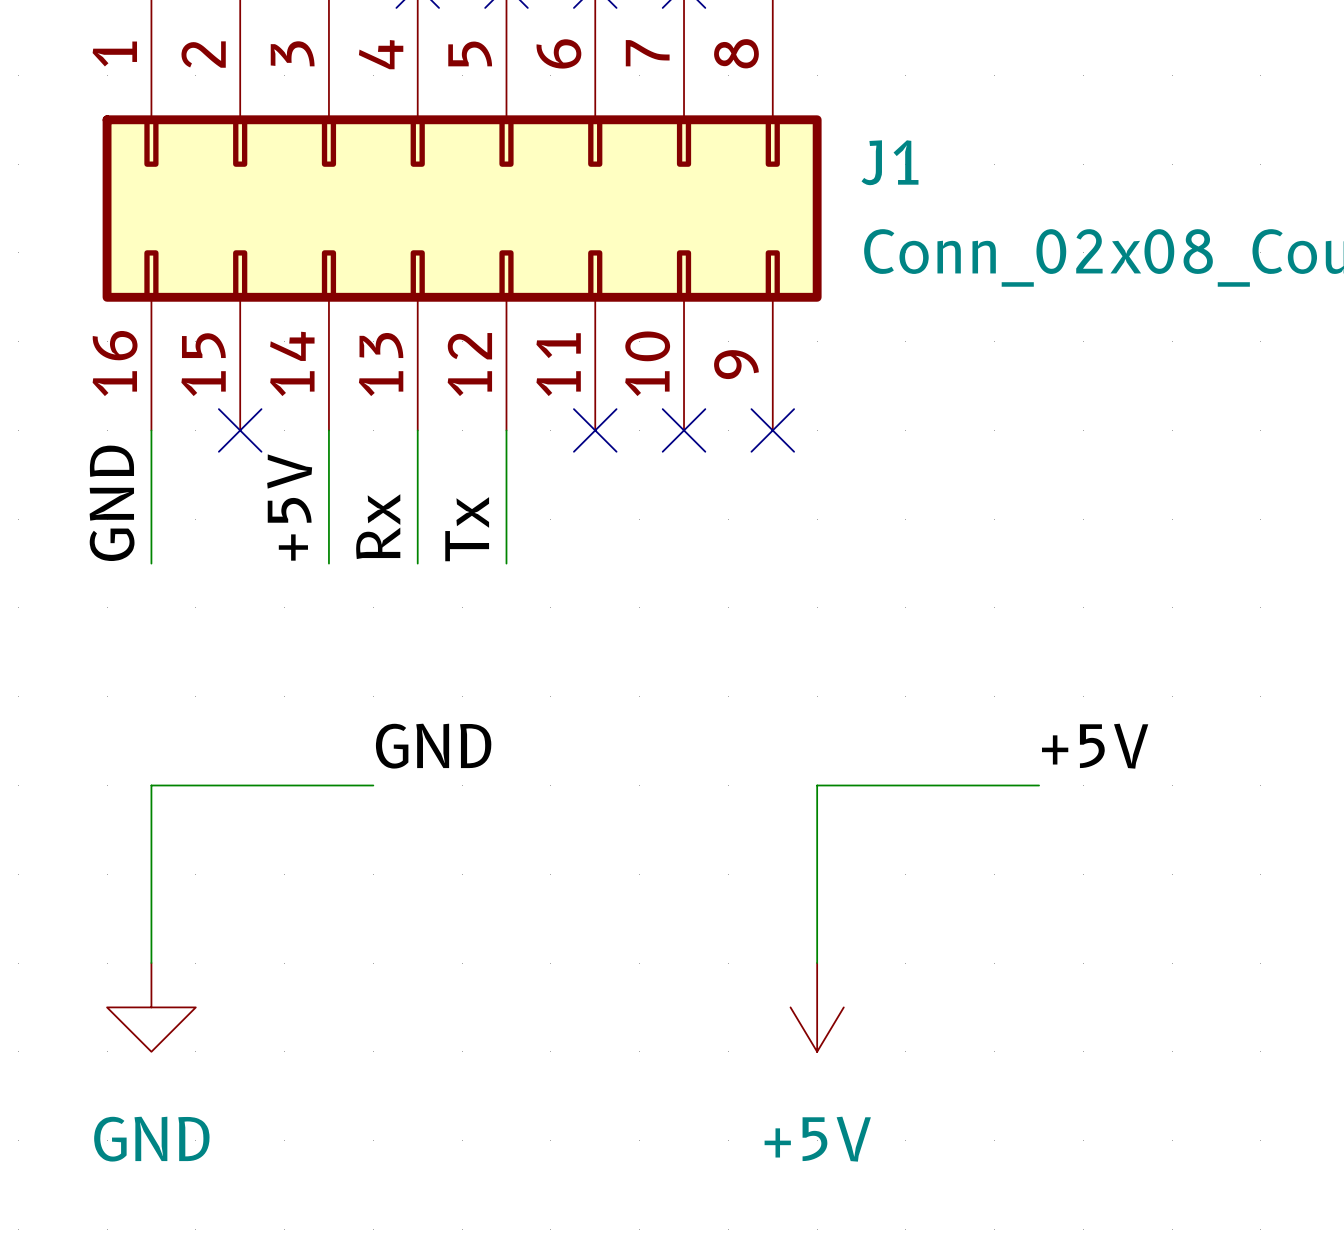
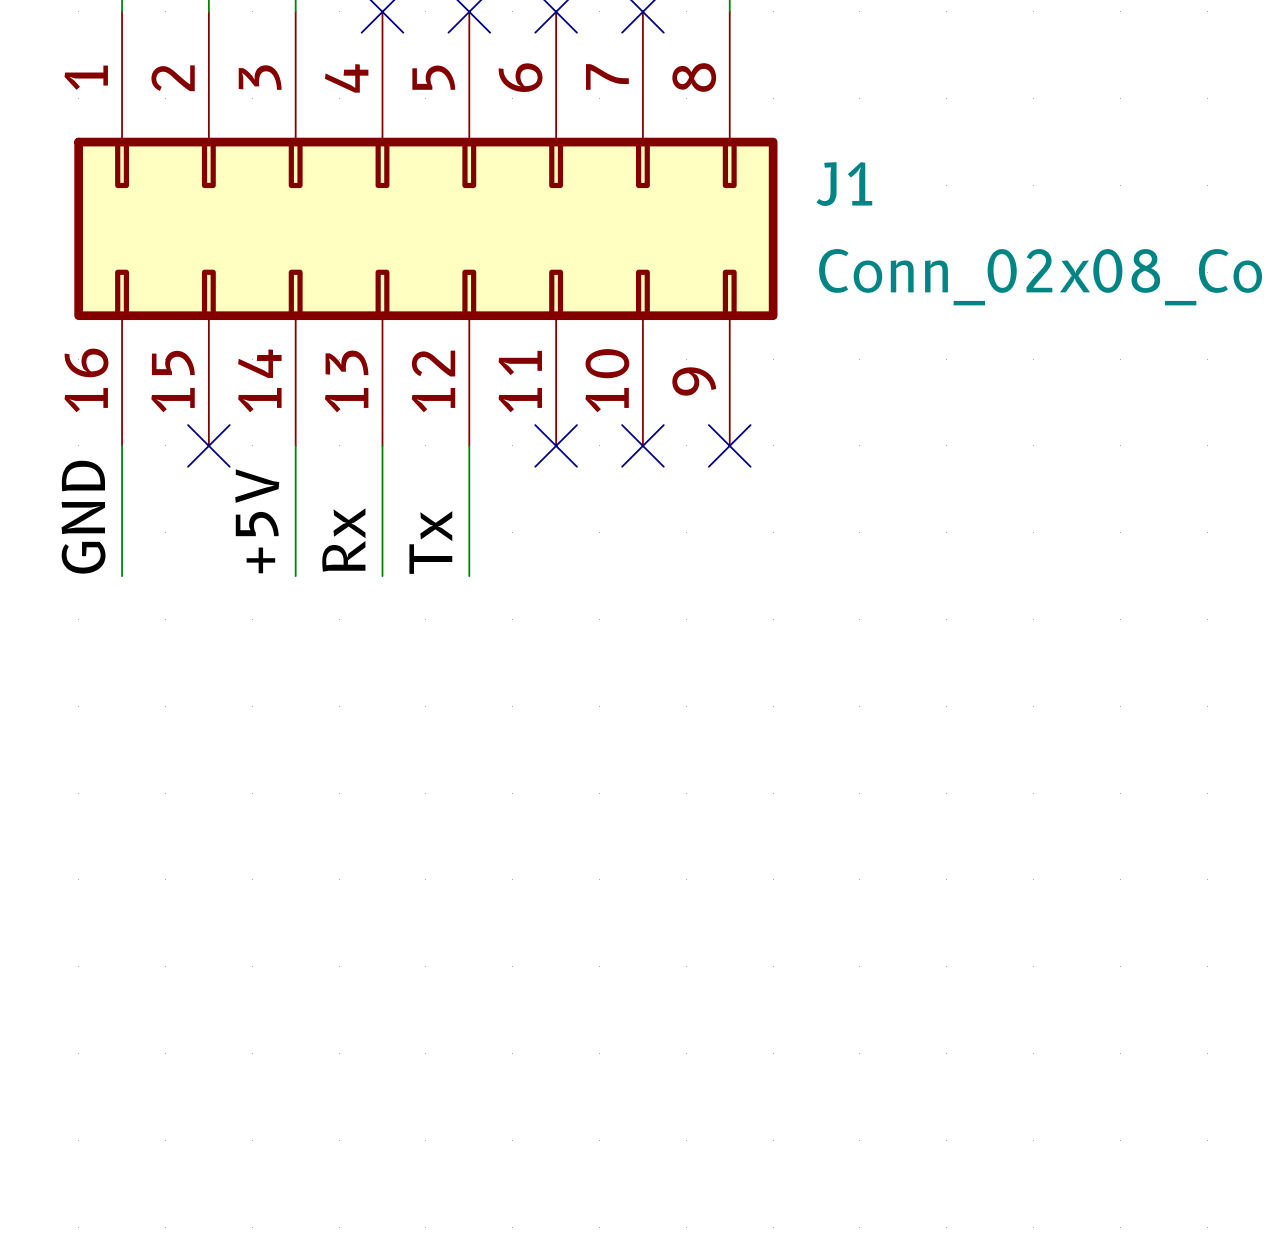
label: GND (433, 746) -> none
label: +5V (1095, 746) -> none
wire: (373, 785) (151, 785) (151, 963) -> none
wire: (1039, 785) (817, 785) (817, 963) -> none
power symbol: GND (151, 1007) -> none
power symbol: +5V (817, 1007) -> none

